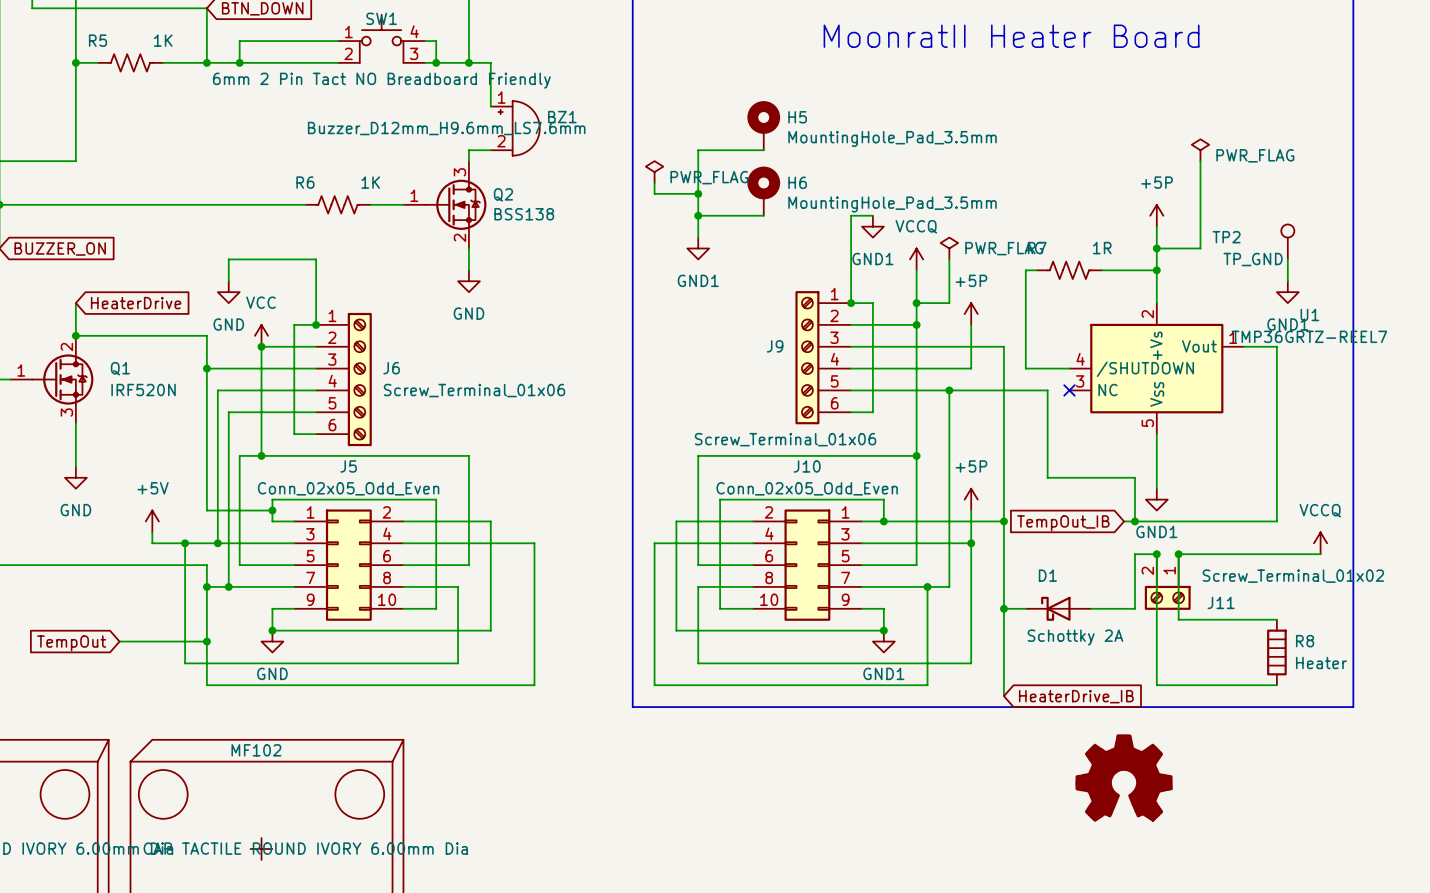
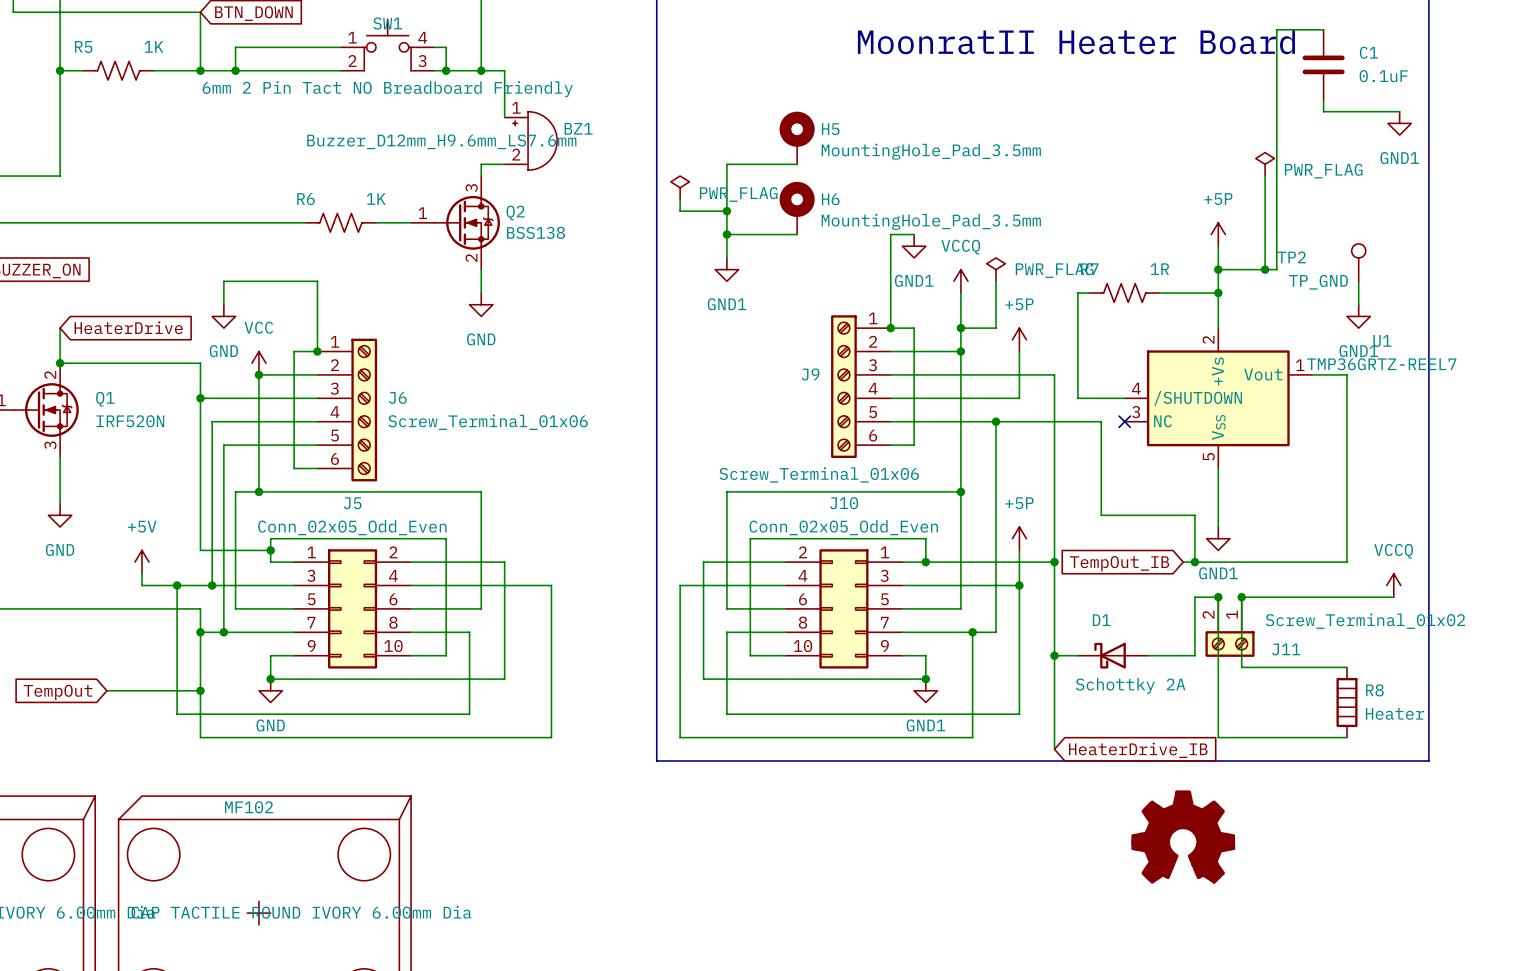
wire: none -> (1323, 29) (1276, 29) (1276, 269) (1265, 269)
C1: none -> 0.1uF (1323, 64)
wire: none -> (1323, 99) (1323, 111) (1399, 111)
power symbol: none -> GND1 (1399, 123)
junction: none -> (1265, 269)

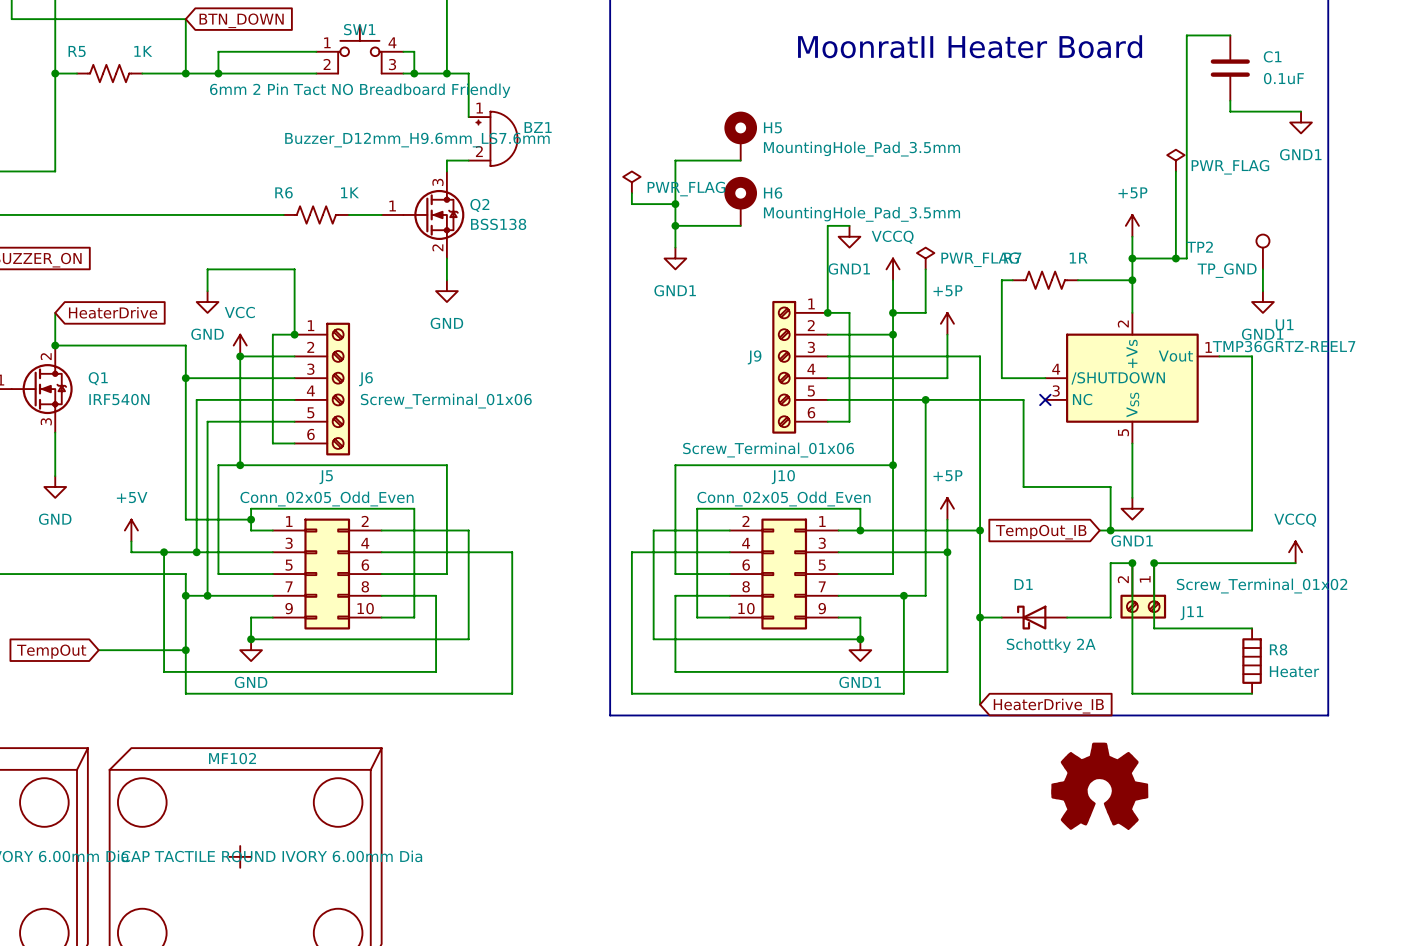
Q1 value: IRF520N (130, 421) -> IRF540N (119, 399)

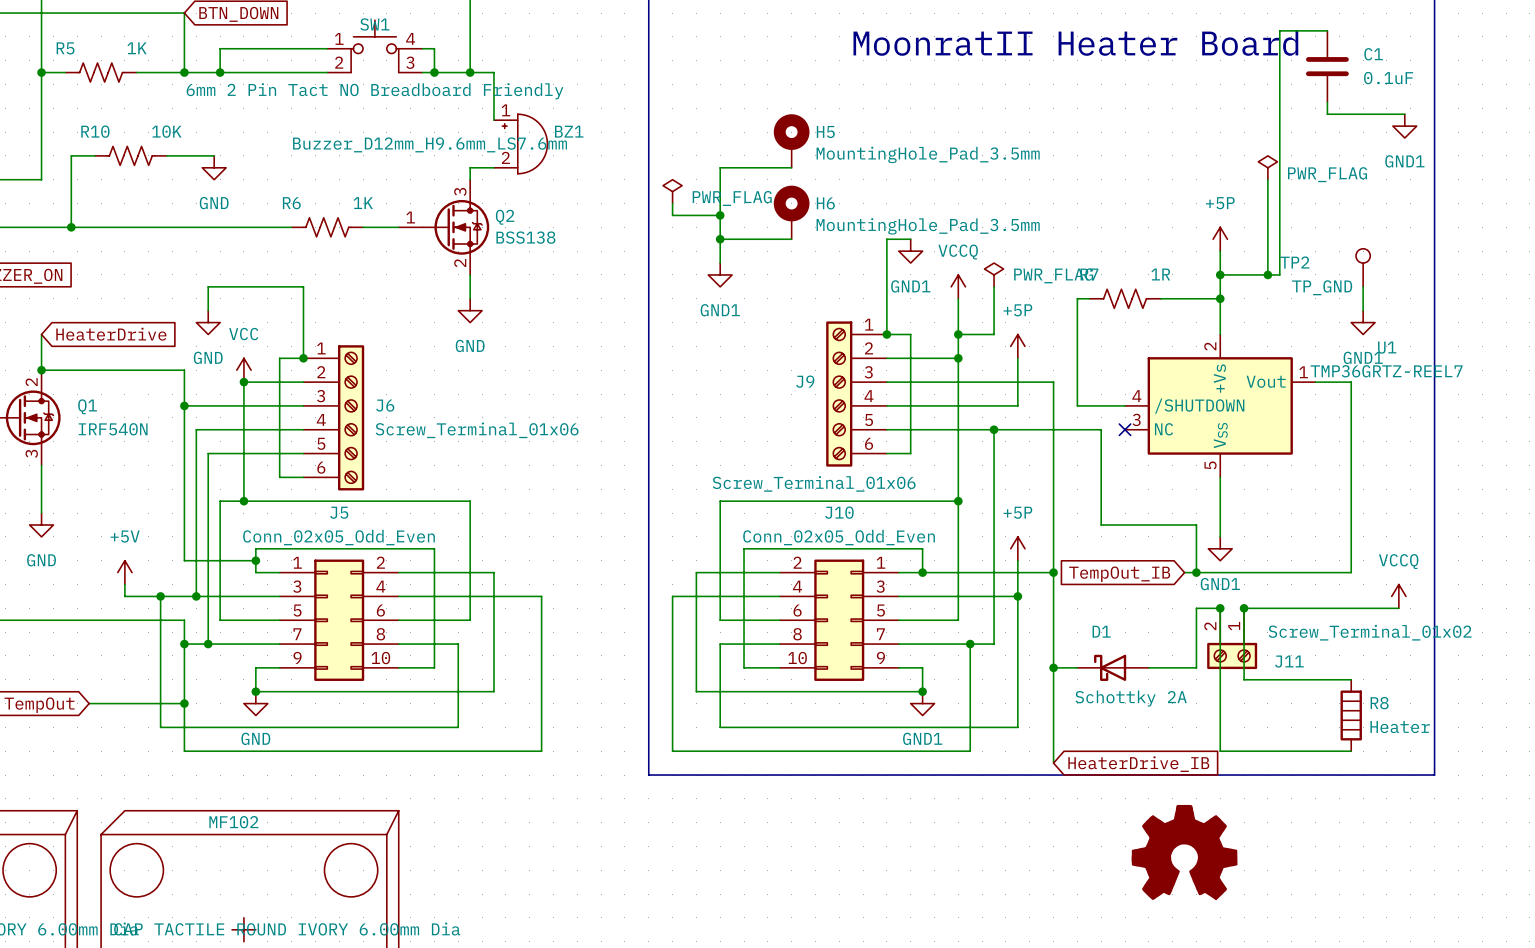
wire: none -> (95, 155) (71, 155) (71, 227)
R10: none -> 10K (130, 155)
wire: none -> (166, 155) (214, 155)
power symbol: none -> GND (214, 167)
junction: none -> (71, 227)

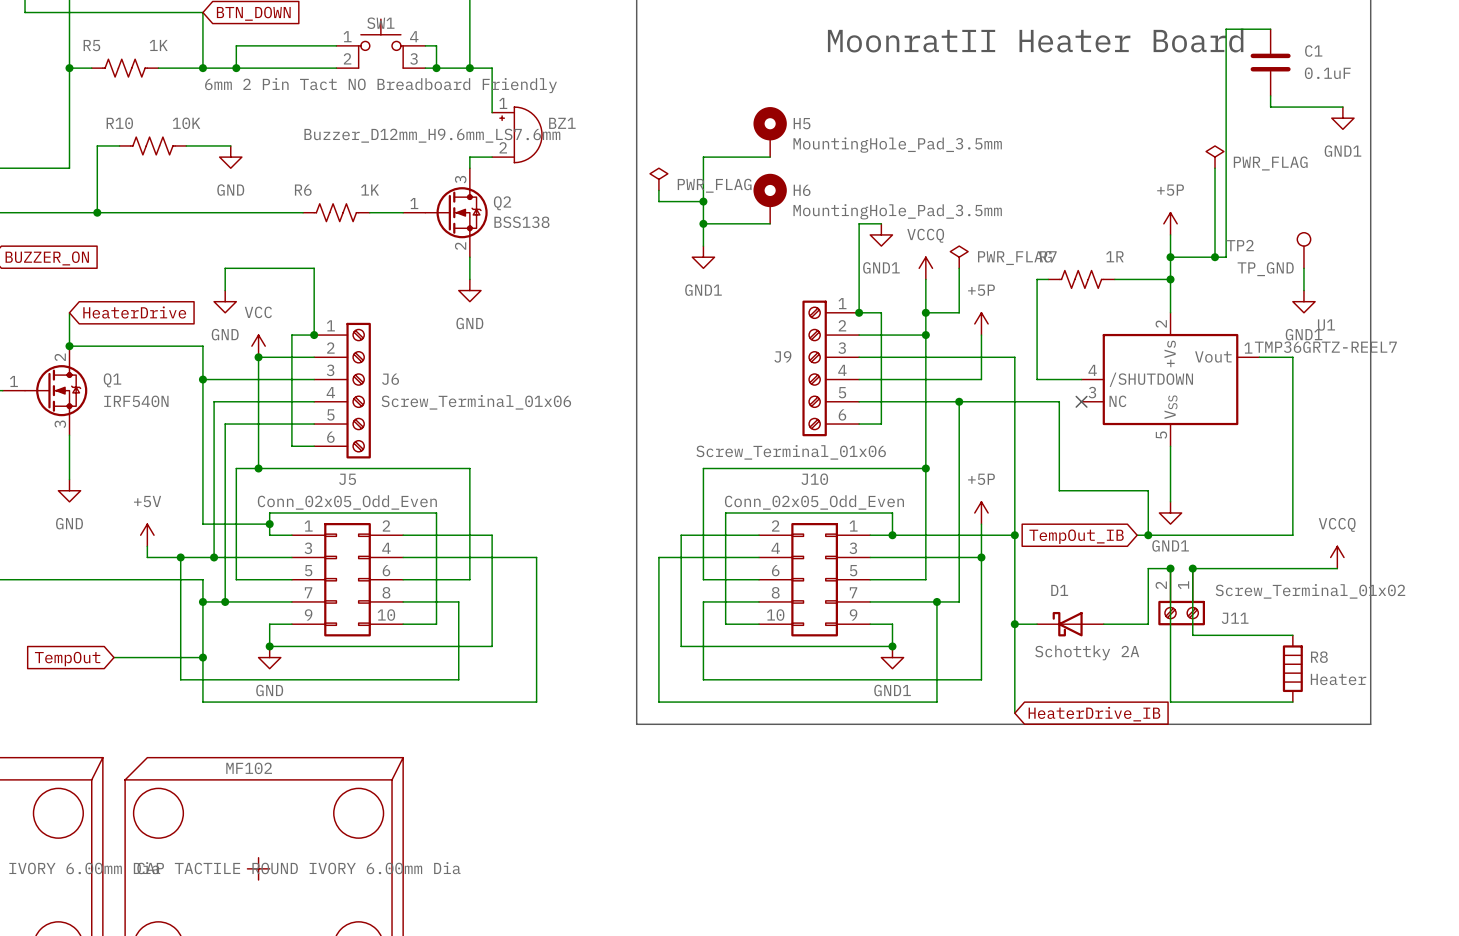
part: (1184, 852) -> none

